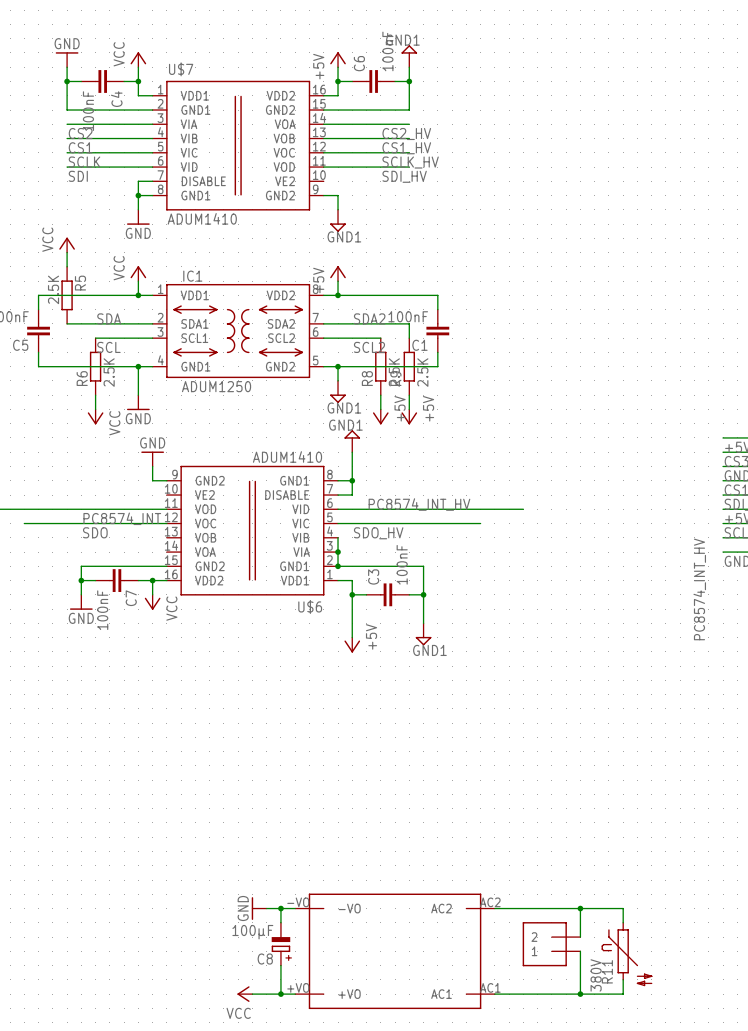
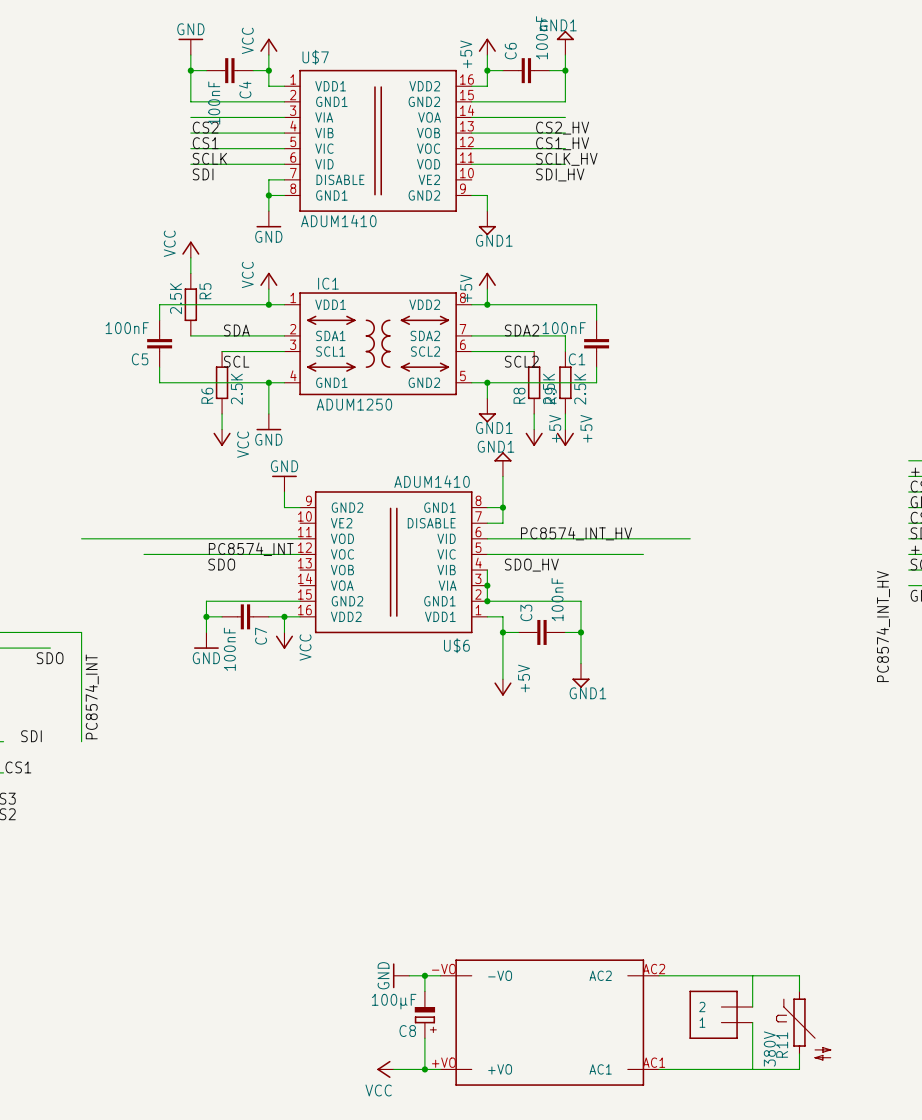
junction: (580, 908) -> none
junction: (580, 994) -> none

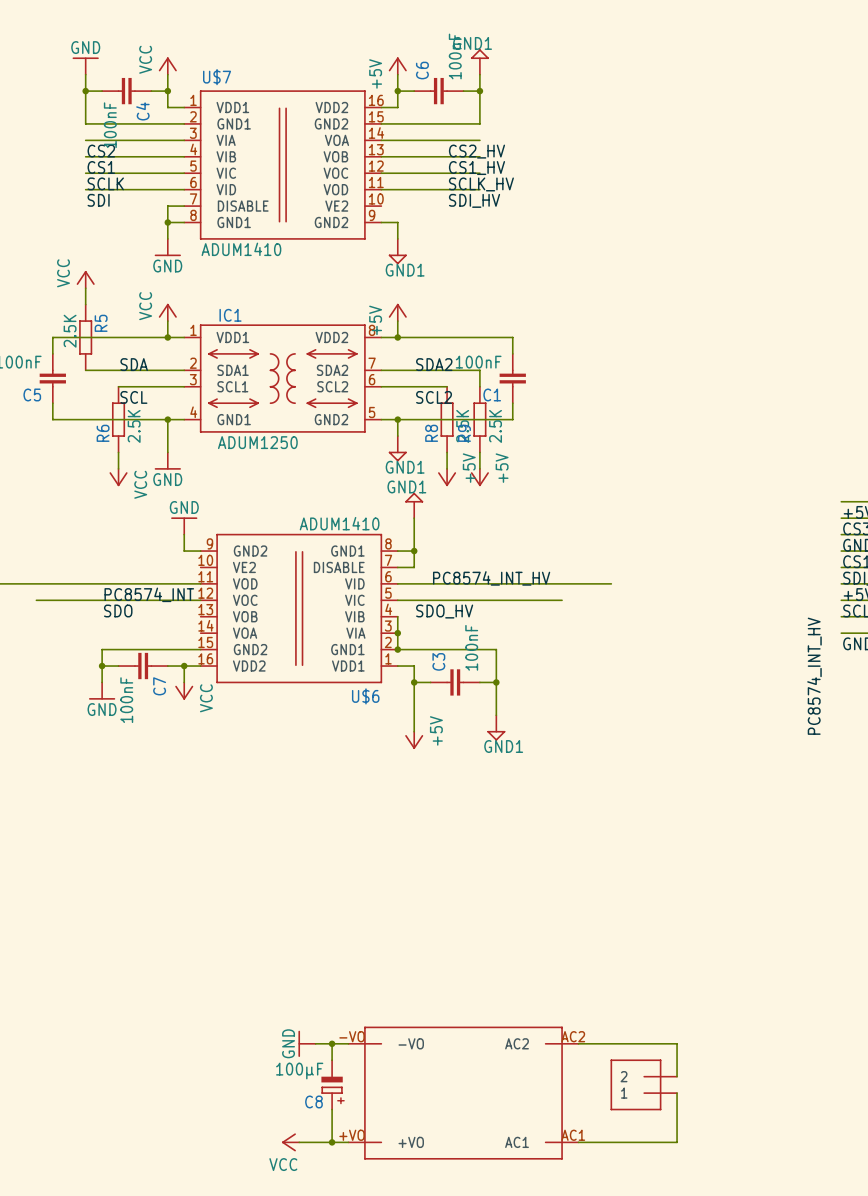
wire: (752, 975) (799, 975) (799, 991) -> none
R11: 380V (803, 1025) -> none
wire: (799, 1053) (799, 1069) (752, 1069) -> none

